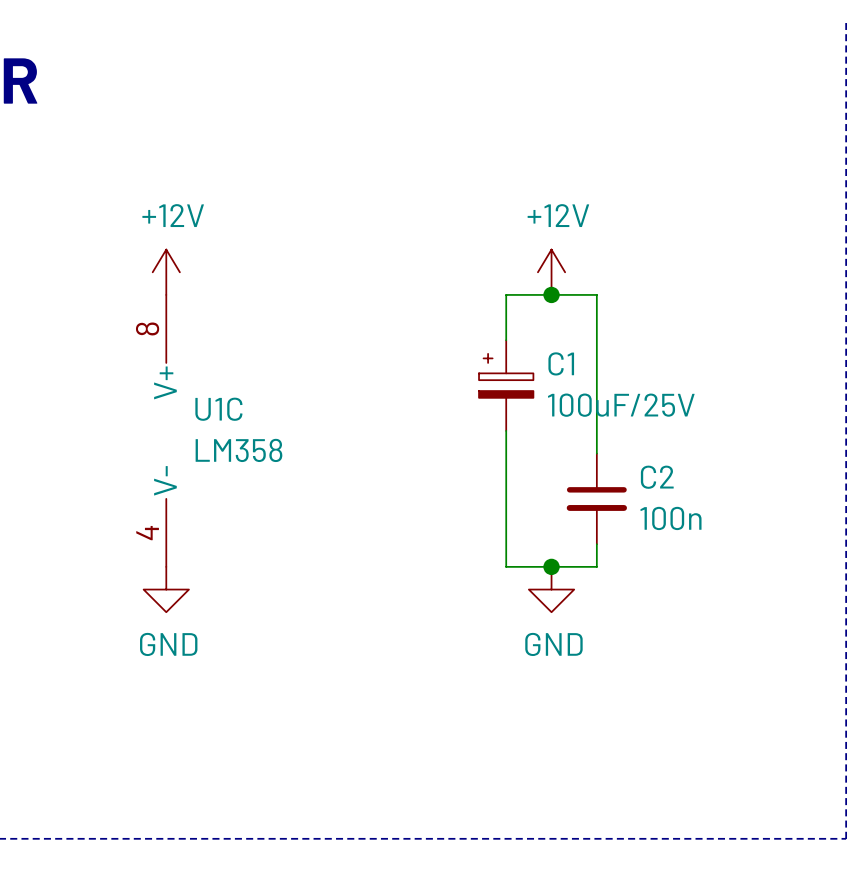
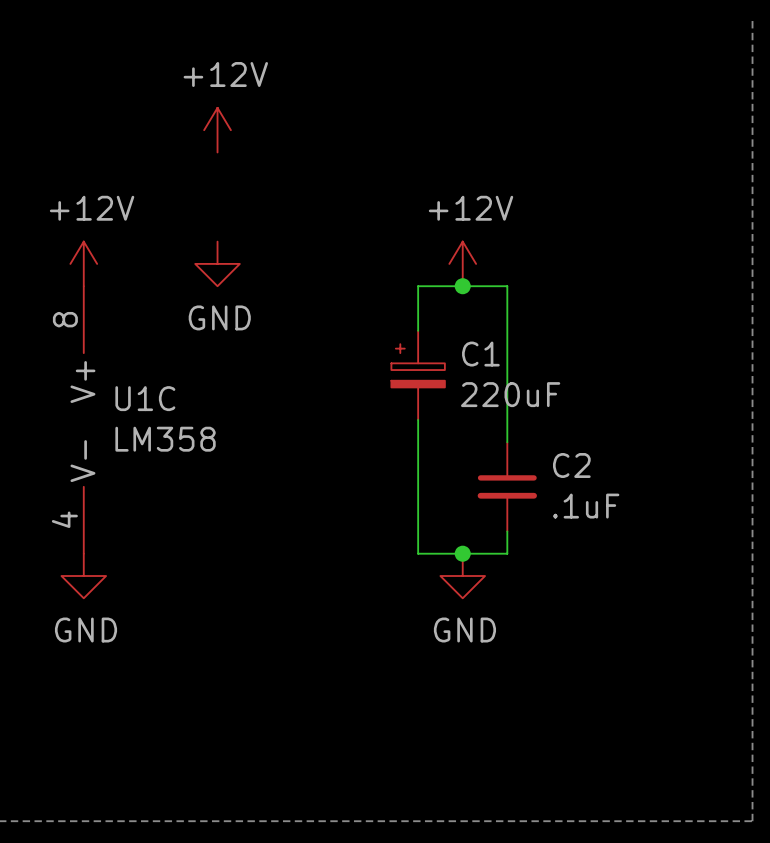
power symbol: none -> +12V (217, 130)
power symbol: none -> GND (217, 263)
C1 value: 100uF/25V (621, 405) -> 220uF (510, 394)
C2 value: 100n (670, 518) -> .1uF (586, 506)

